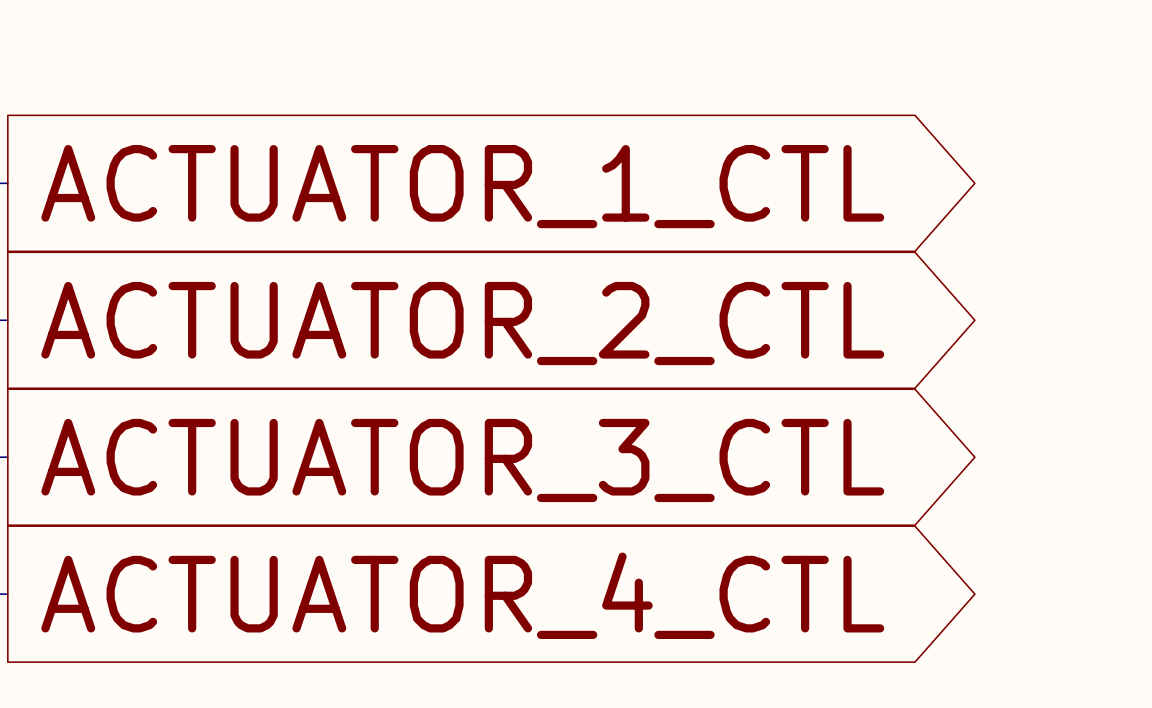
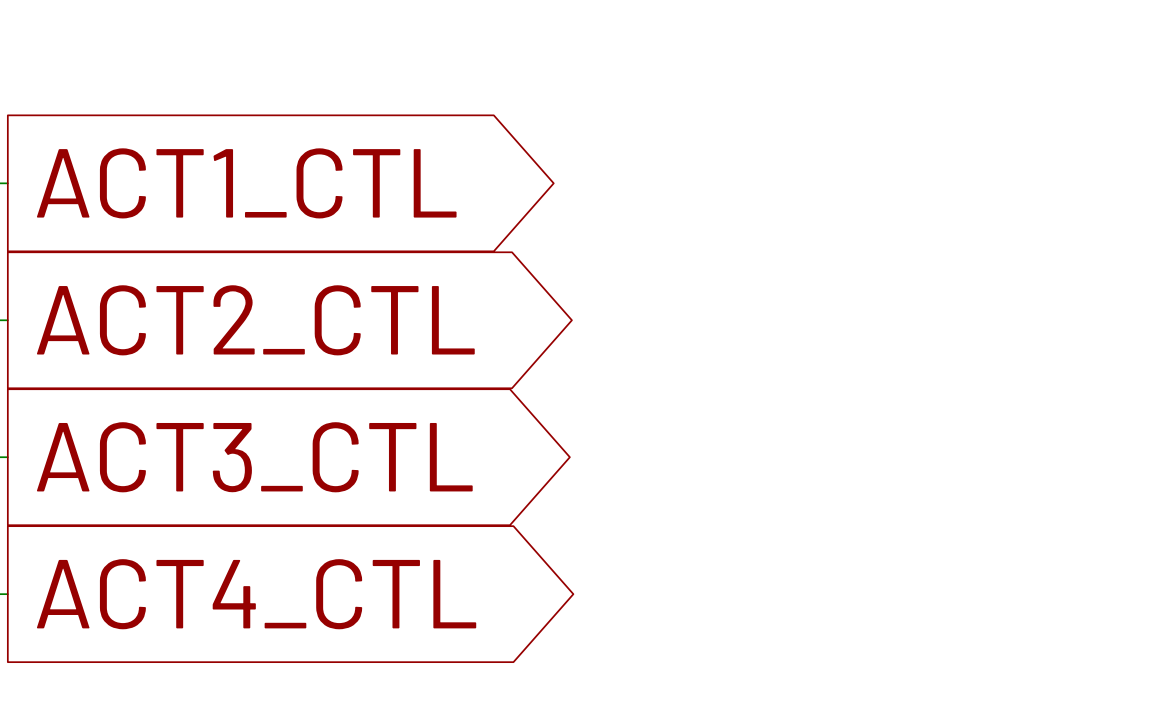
global label: ACTUATOR_1_CTL (462, 186) -> ACT1_CTL (246, 183)
global label: ACTUATOR_2_CTL (462, 323) -> ACT2_CTL (255, 320)
global label: ACTUATOR_3_CTL (462, 460) -> ACT3_CTL (254, 457)
global label: ACTUATOR_4_CTL (462, 595) -> ACT4_CTL (256, 594)

